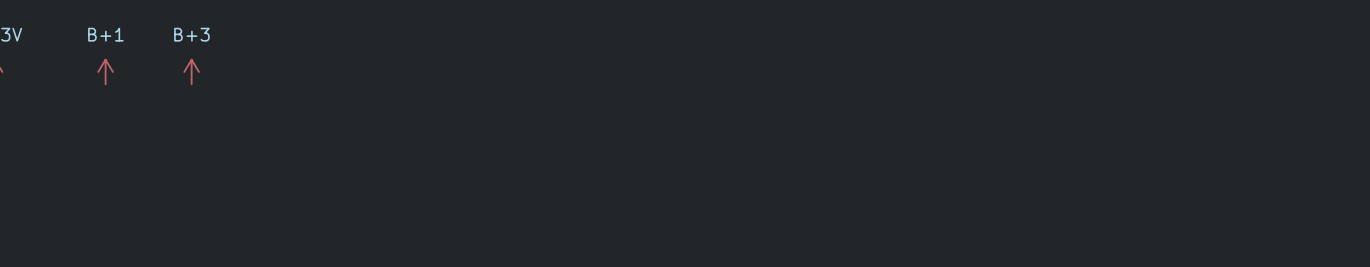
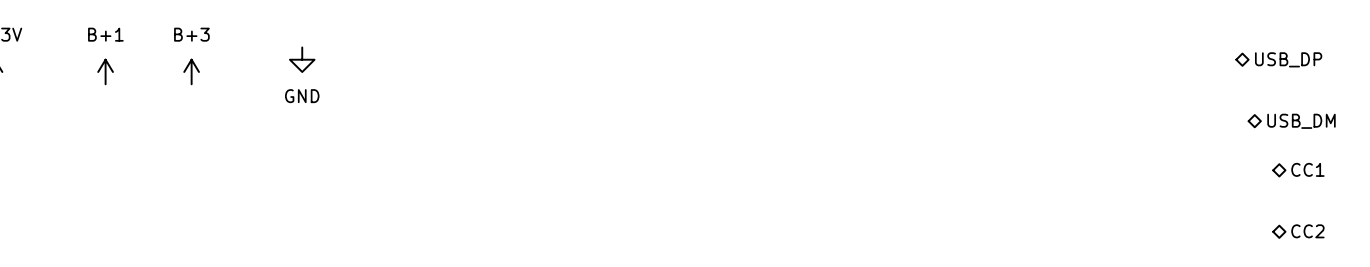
power symbol: none -> GND (302, 59)
hierarchical label: none -> USB_DP (1288, 59)
hierarchical label: none -> USB_DM (1301, 121)
hierarchical label: none -> CC1 (1307, 169)
hierarchical label: none -> CC2 (1307, 231)

